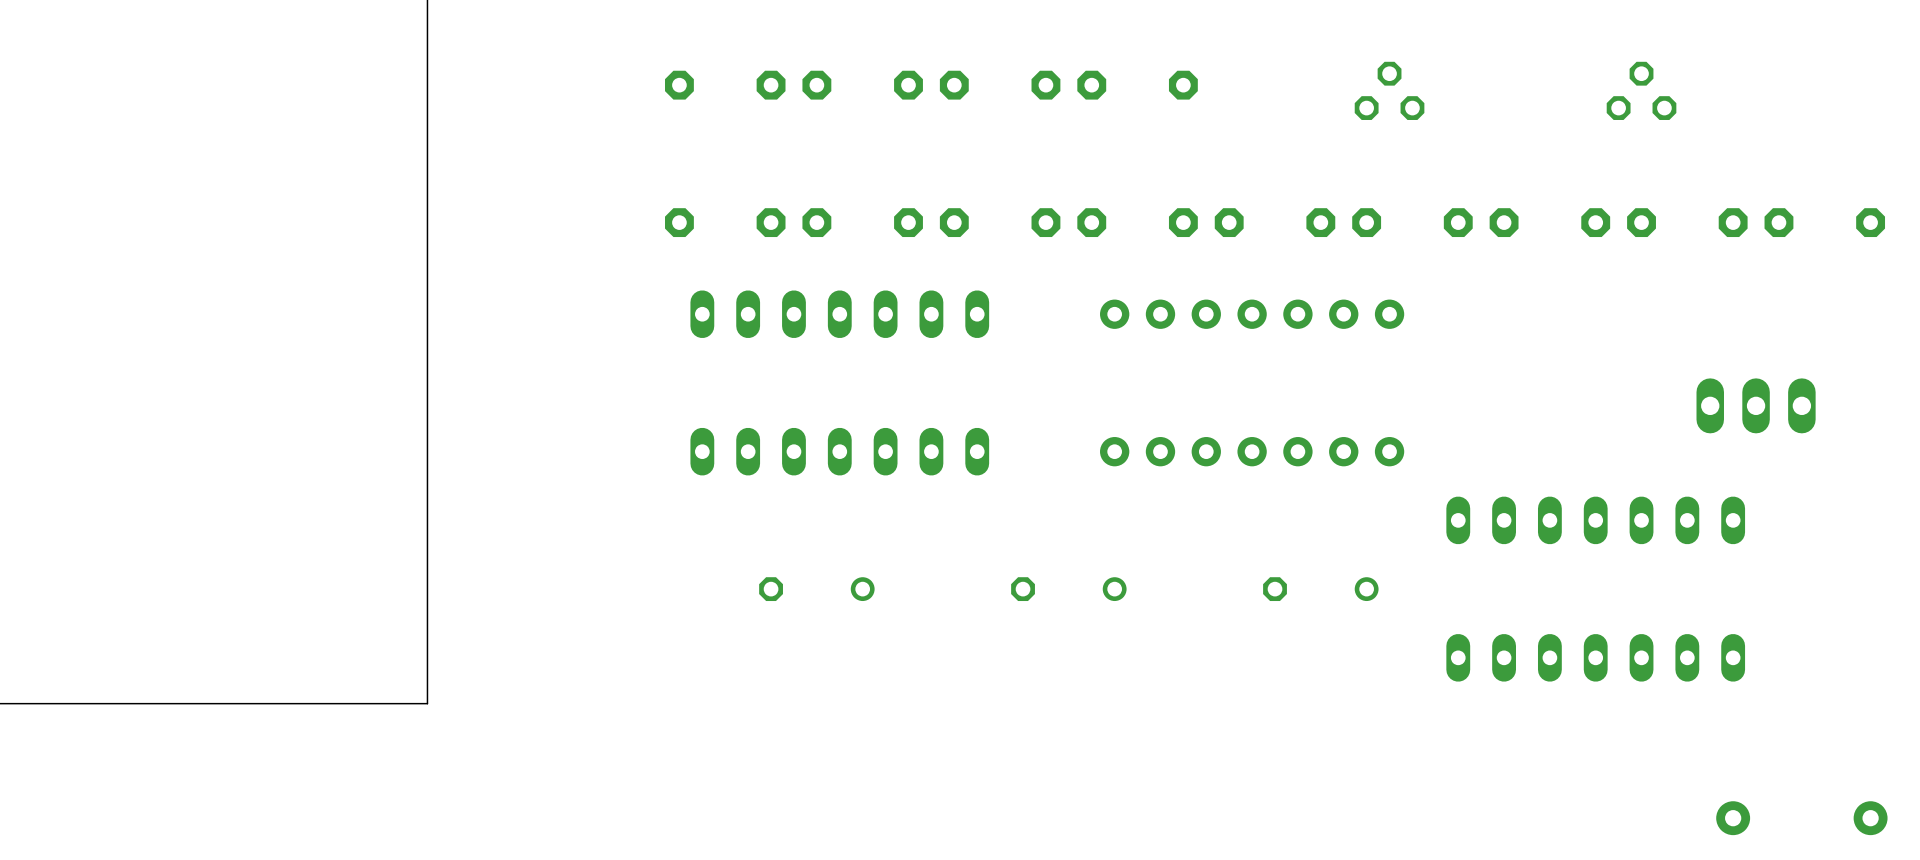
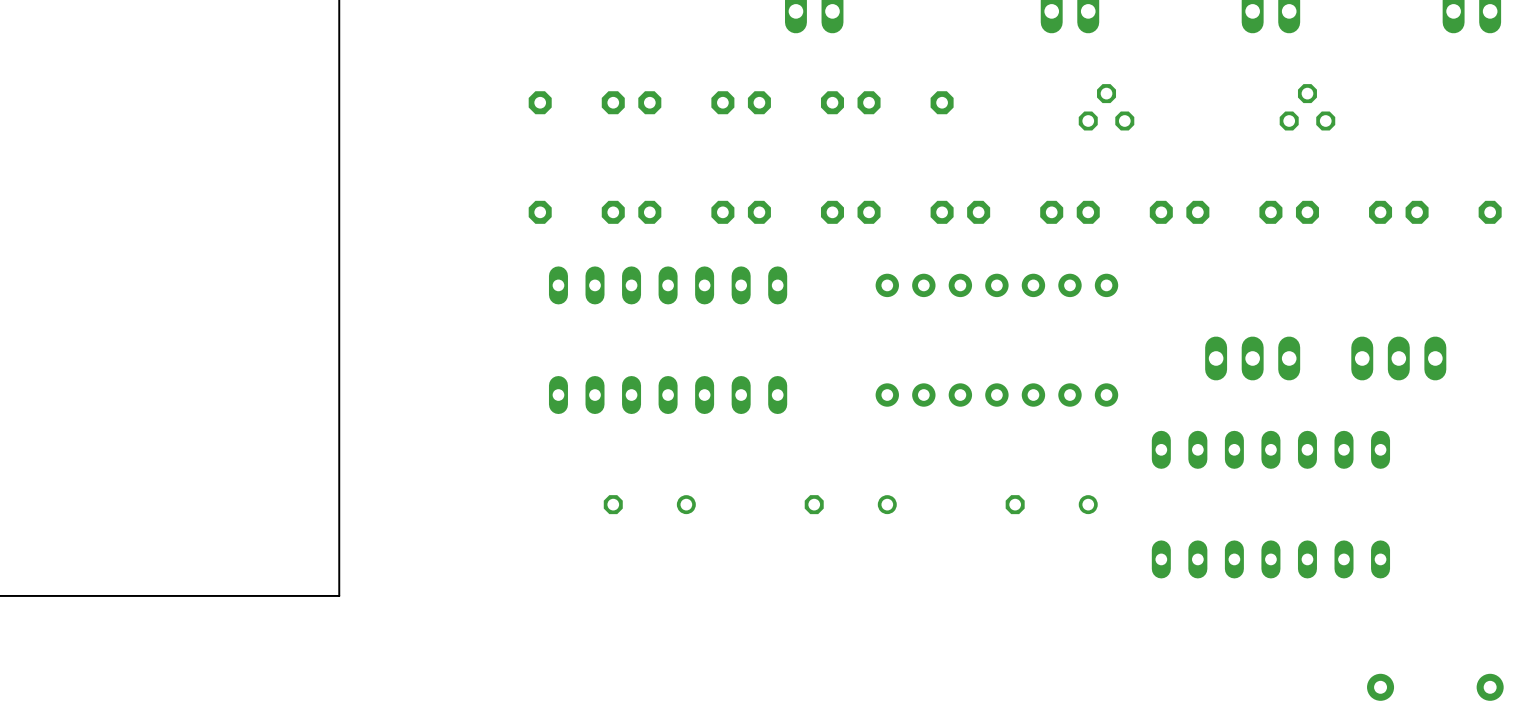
part: none -> (1252, 358)

